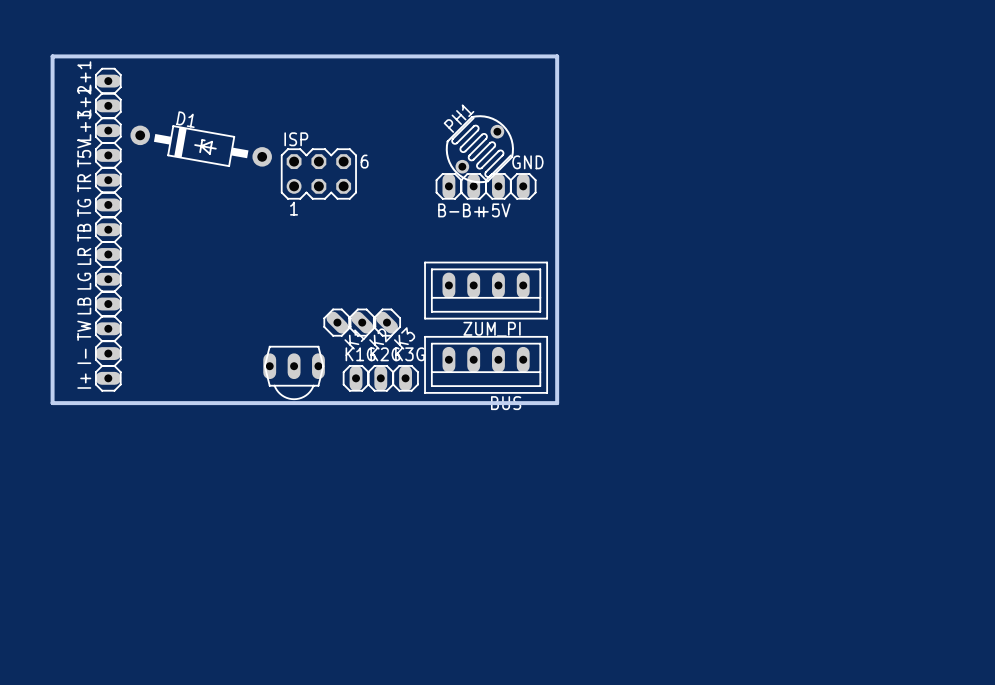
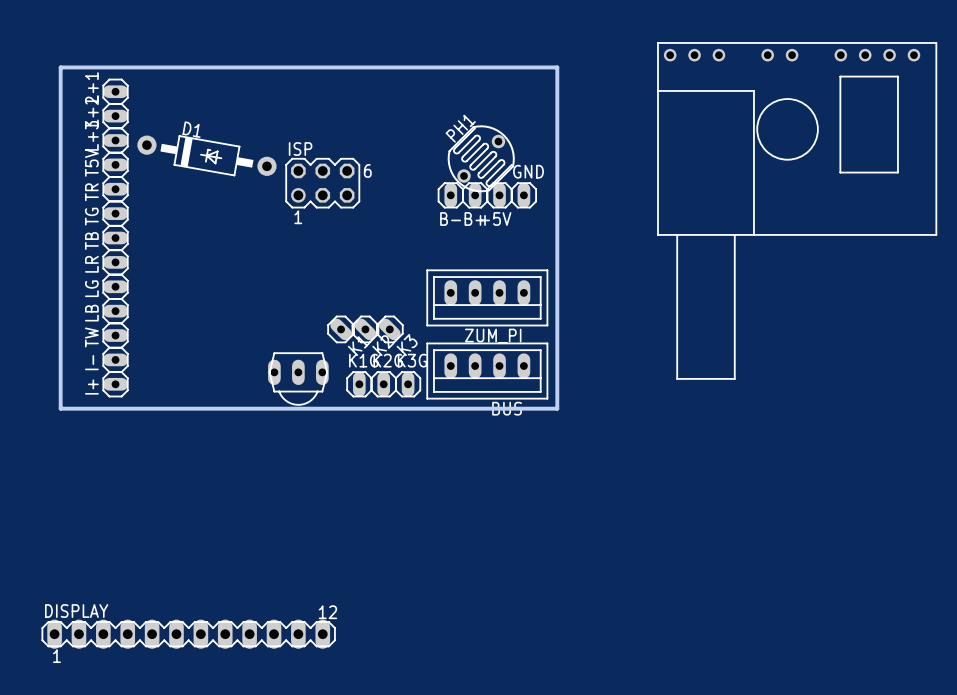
part: none -> (797, 210)
DISPLAY: none -> (188, 634)

